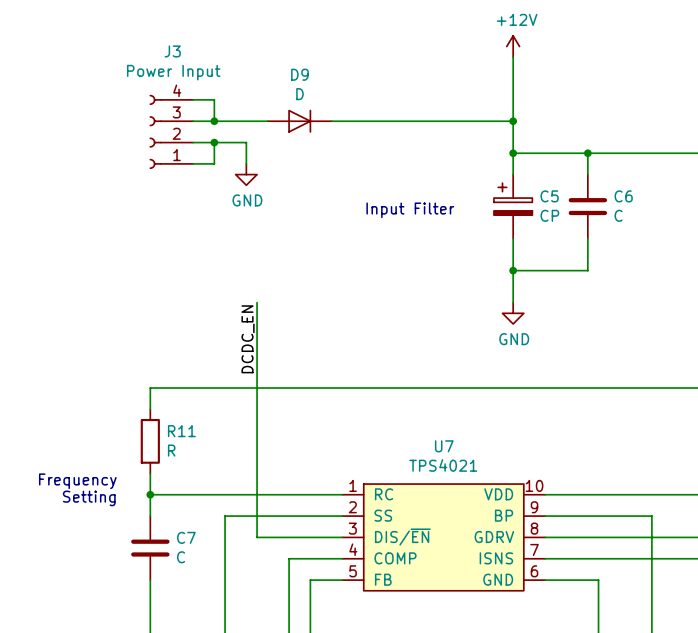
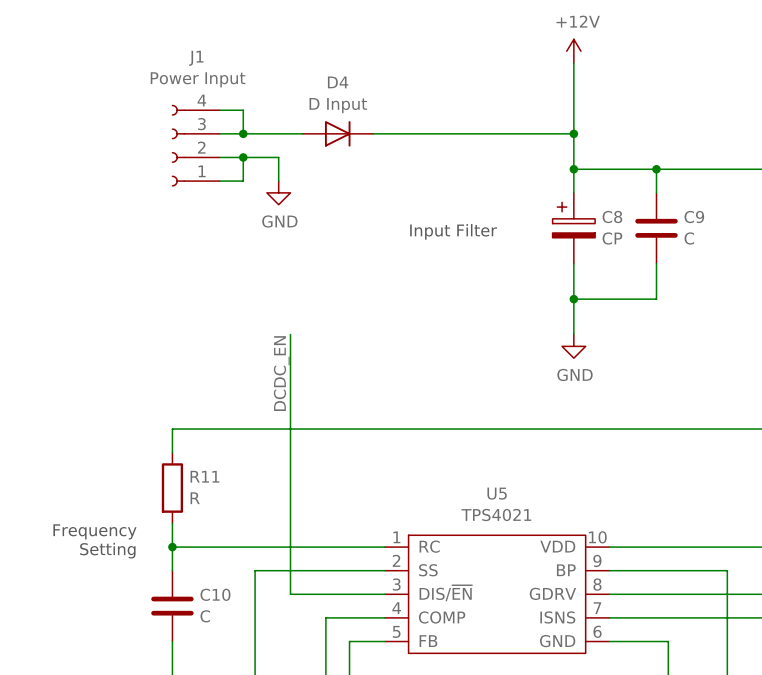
J3 name: J3 (172, 51) -> J1 (196, 58)
D9 name: D9 (299, 74) -> D4 (338, 82)
D9 value: D (299, 94) -> D Input (338, 105)
C5 name: C5 (549, 196) -> C8 (612, 217)
C6 name: C6 (623, 196) -> C9 (694, 217)
U7 name: U7 (444, 446) -> U5 (497, 493)
C7 name: C7 (186, 537) -> C10 (215, 594)

